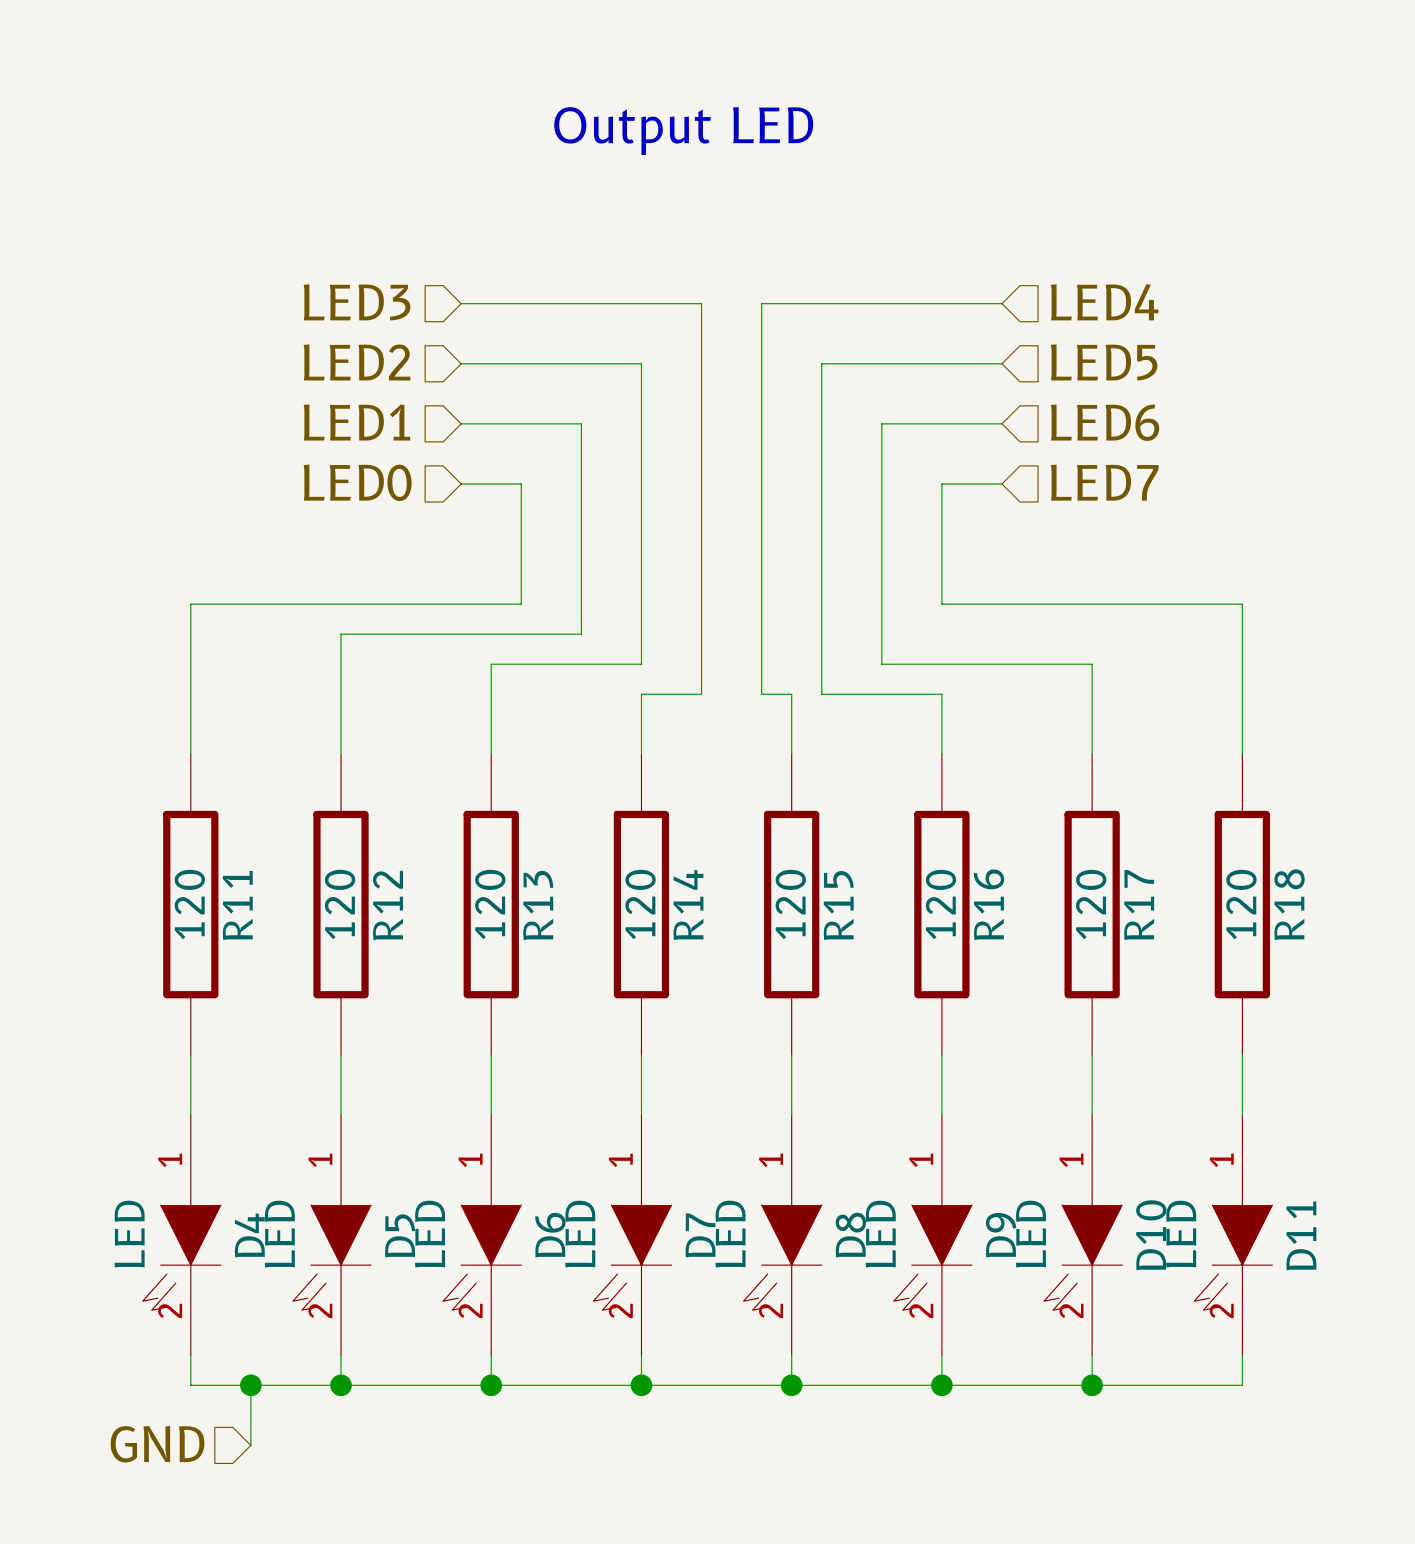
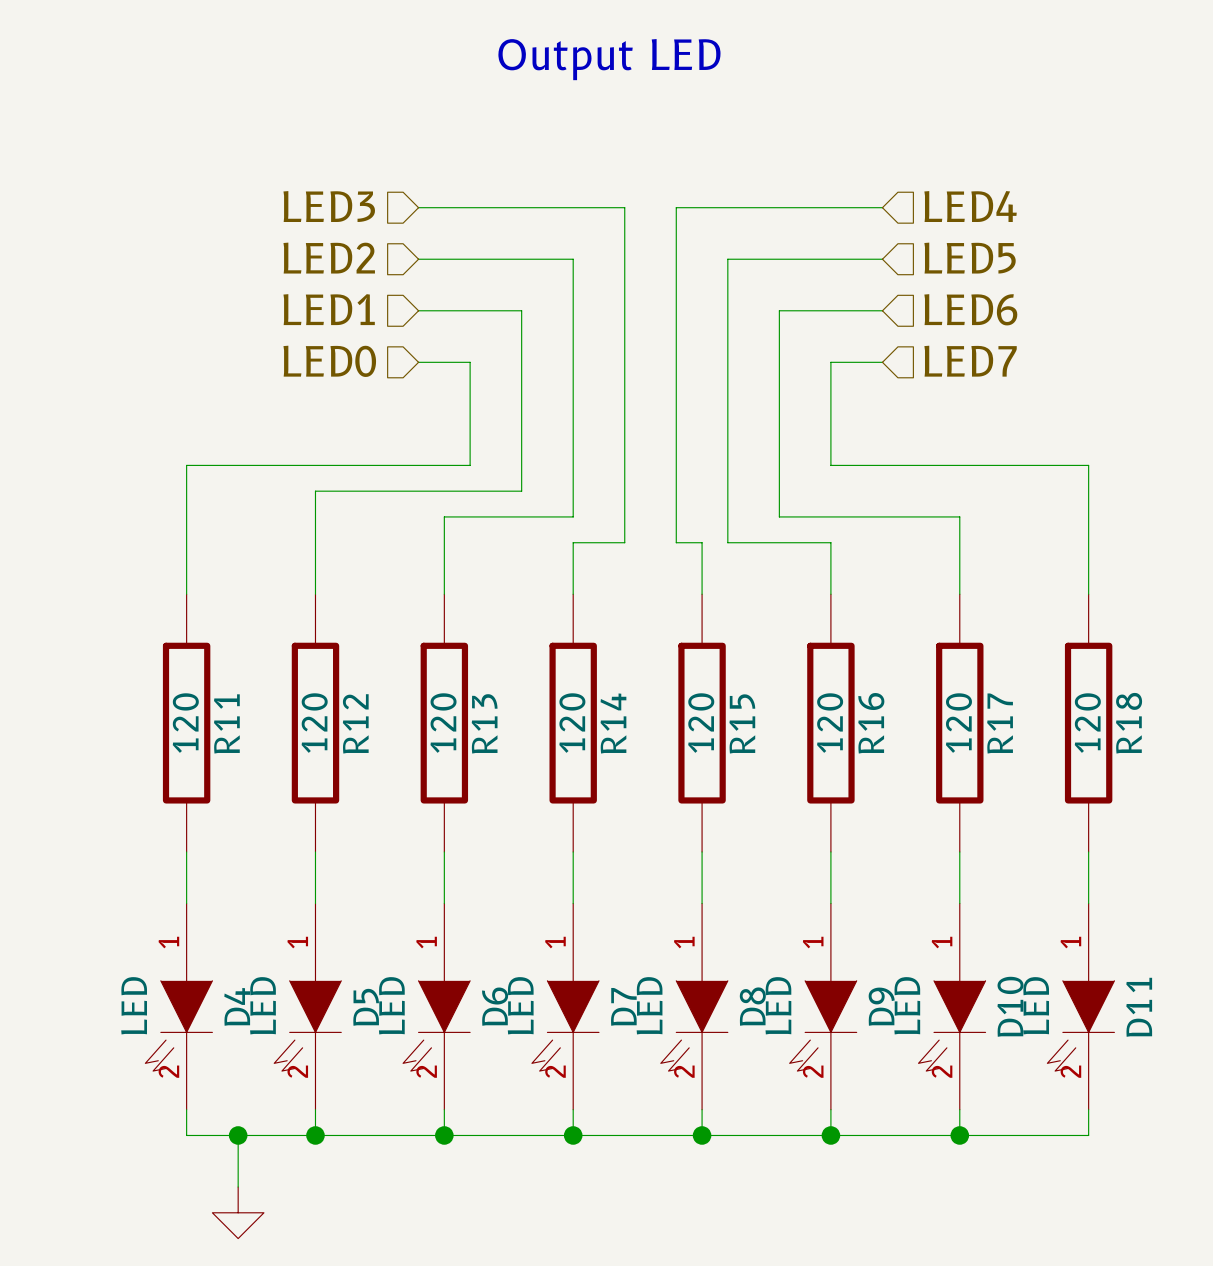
hierarchical label: GND (157, 1444) -> none
power symbol: none -> (238, 1212)

